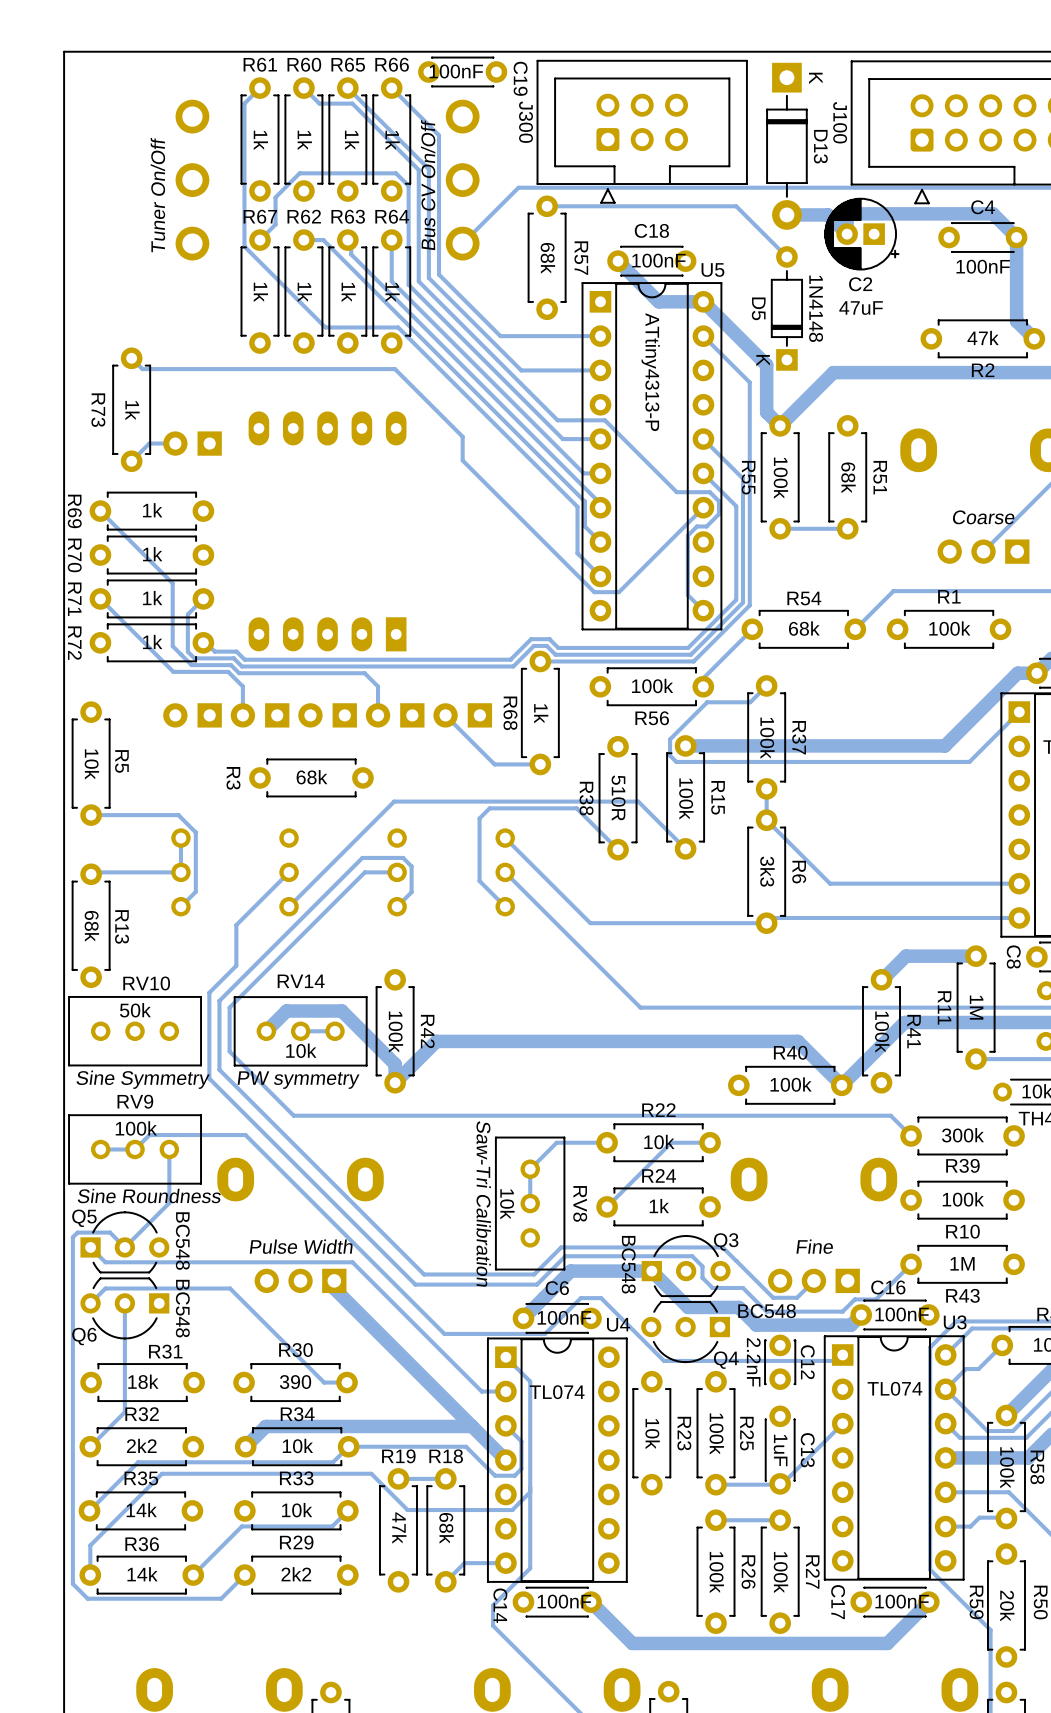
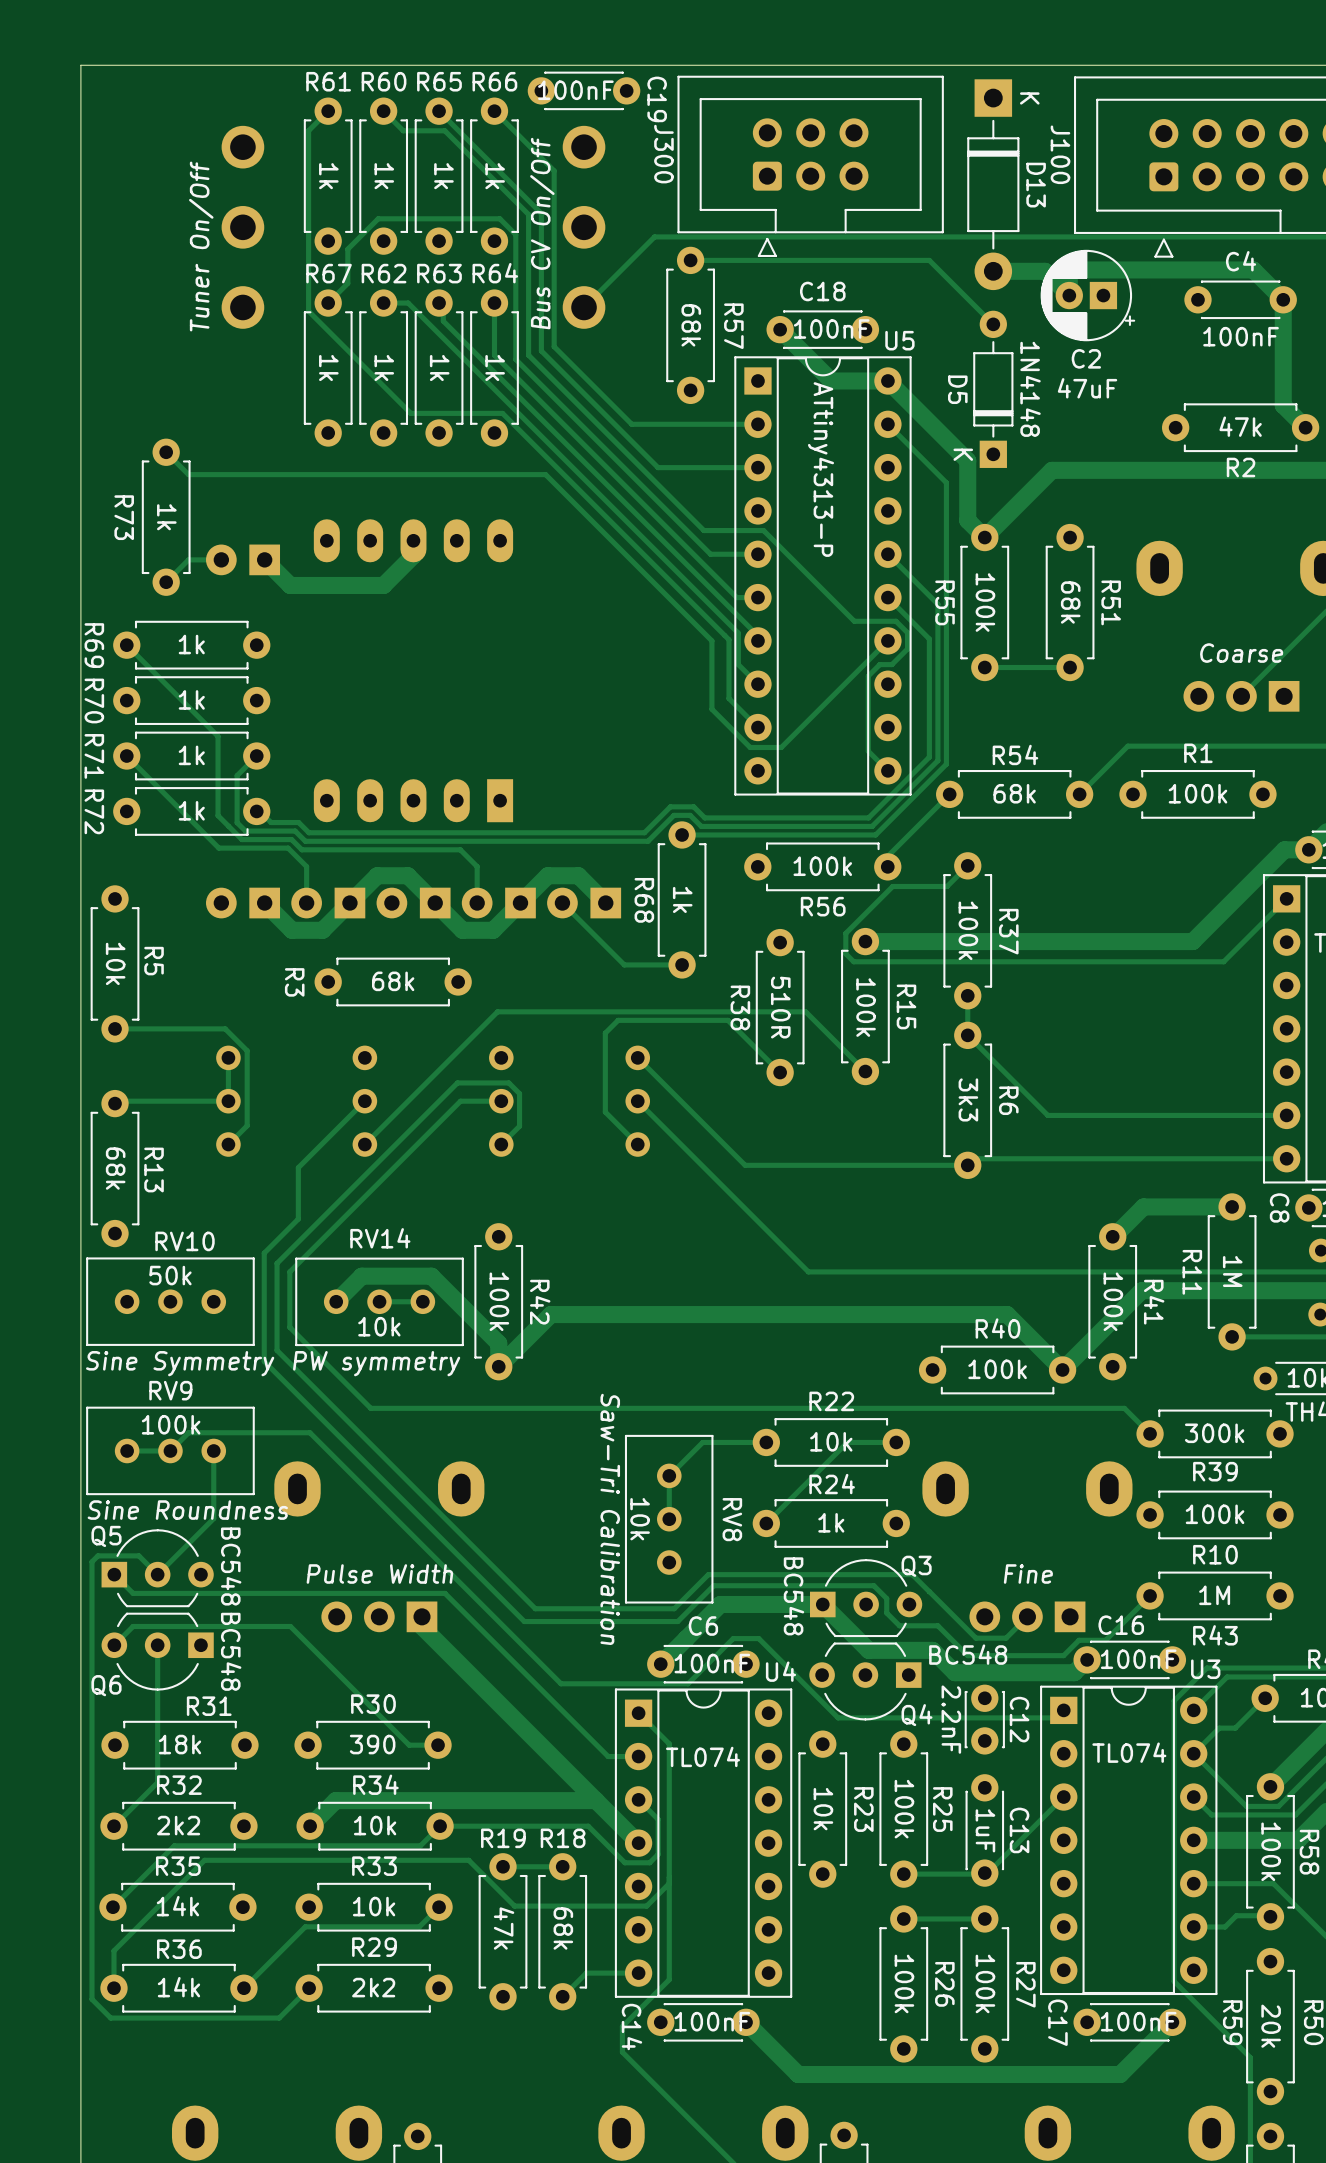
track: (142, 369) (395, 369) (462, 436) (462, 460) (564, 561) -> (179, 465) (188, 474) (545, 474) (711, 640) (711, 709)
track: none -> (413, 540) (413, 555) (383, 585) (290, 585) (264, 559)
track: none -> (605, 903) (578, 875) (547, 875) (493, 930) (462, 930) (407, 875) (377, 875) (322, 930) (291, 930) (264, 903)

